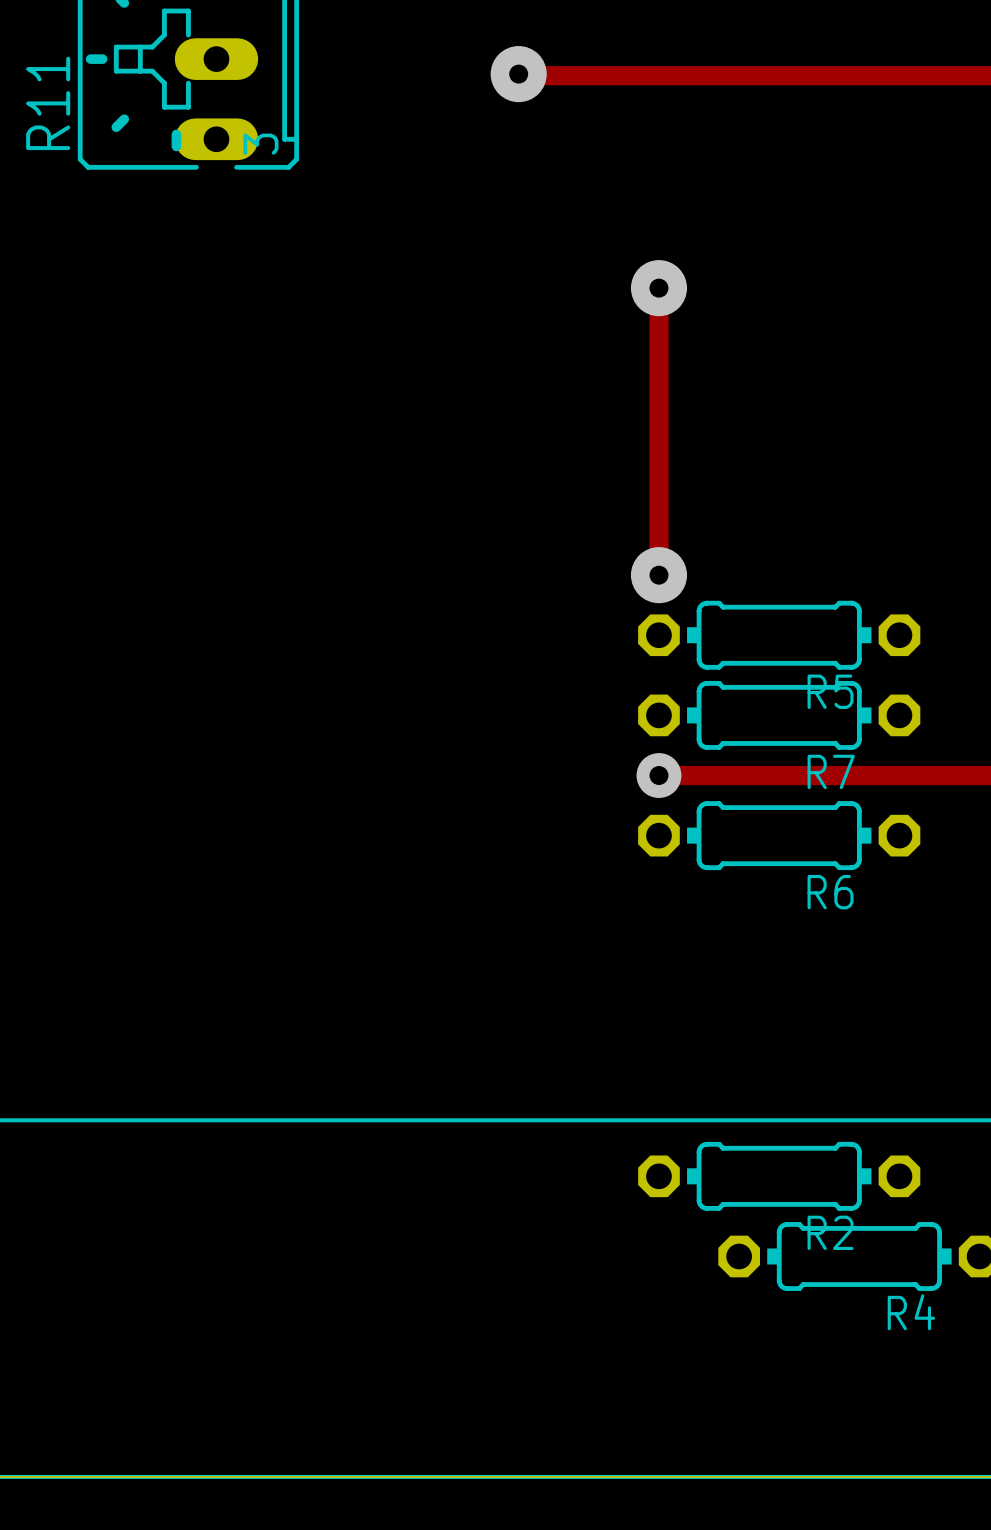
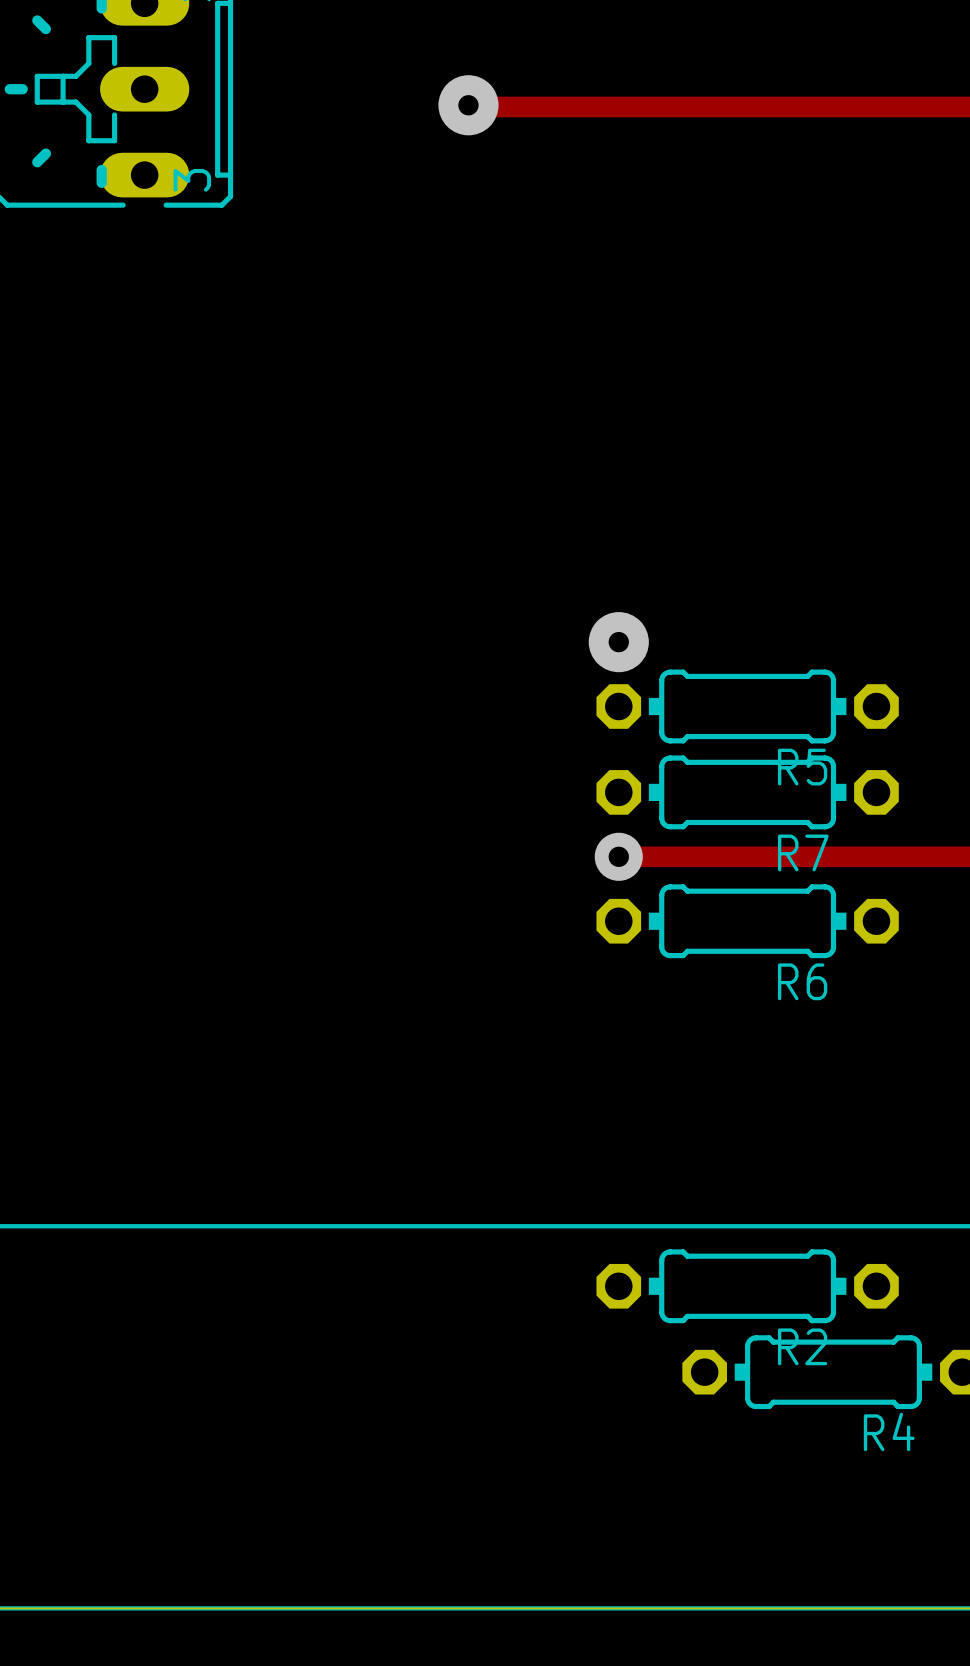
track: (658, 288) (658, 575) -> none
via: (658, 288) -> none

